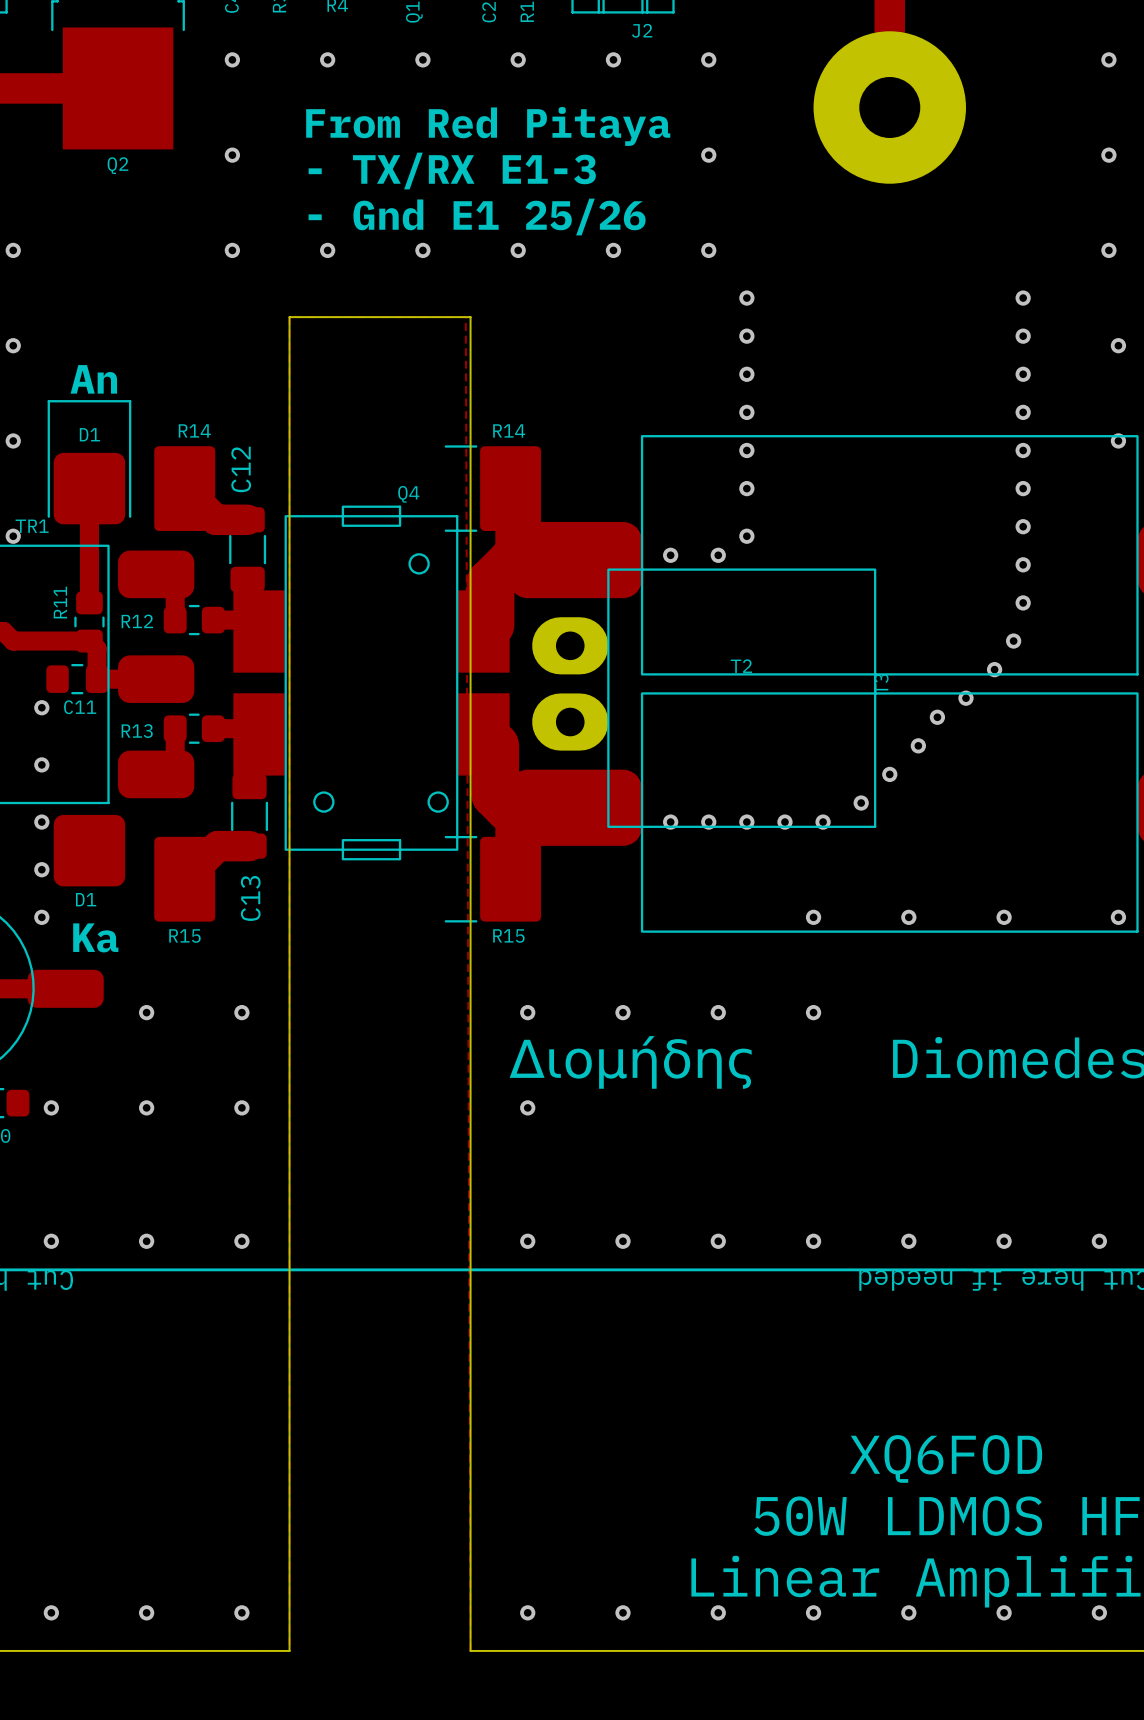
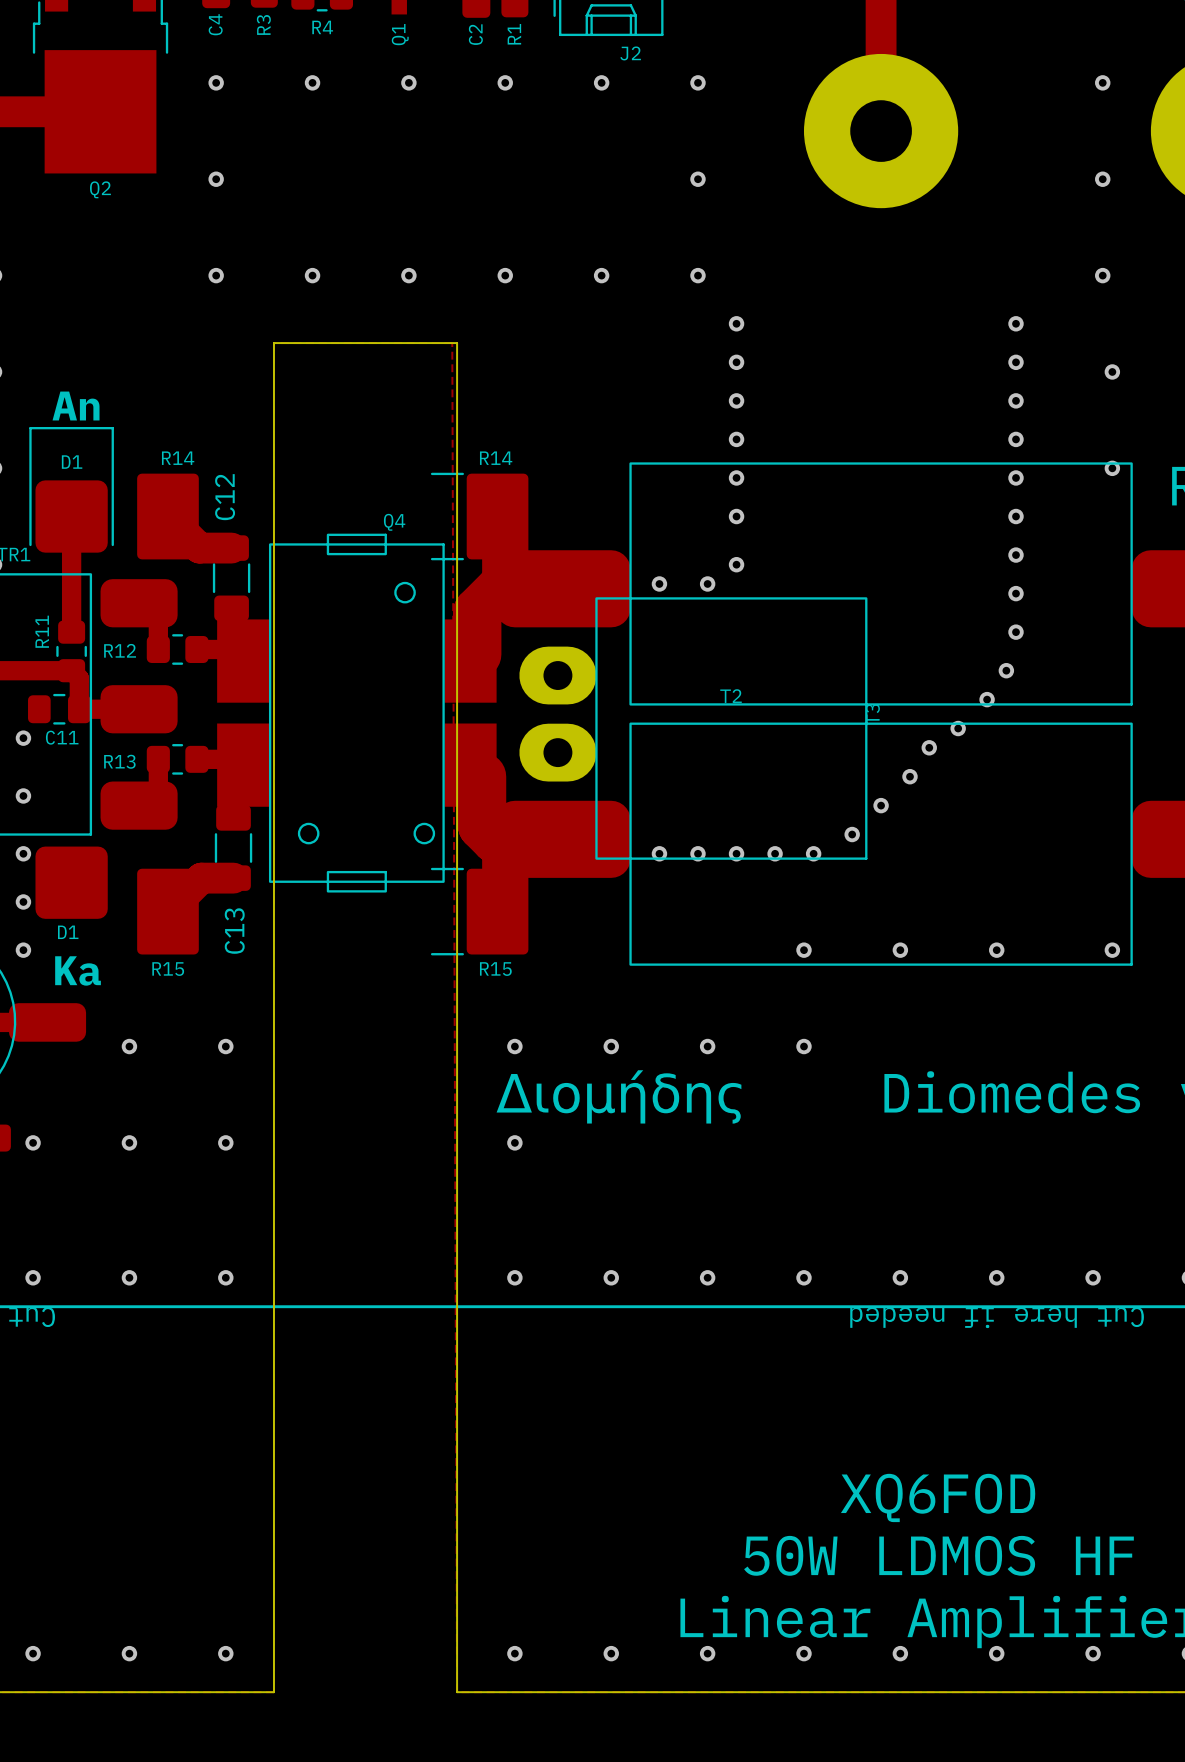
text: From Red Pitaya (488, 126) -> none
text: - TX/RX E1-3 (452, 171) -> none
text: - Gnd E1 25/26 (477, 217) -> none

